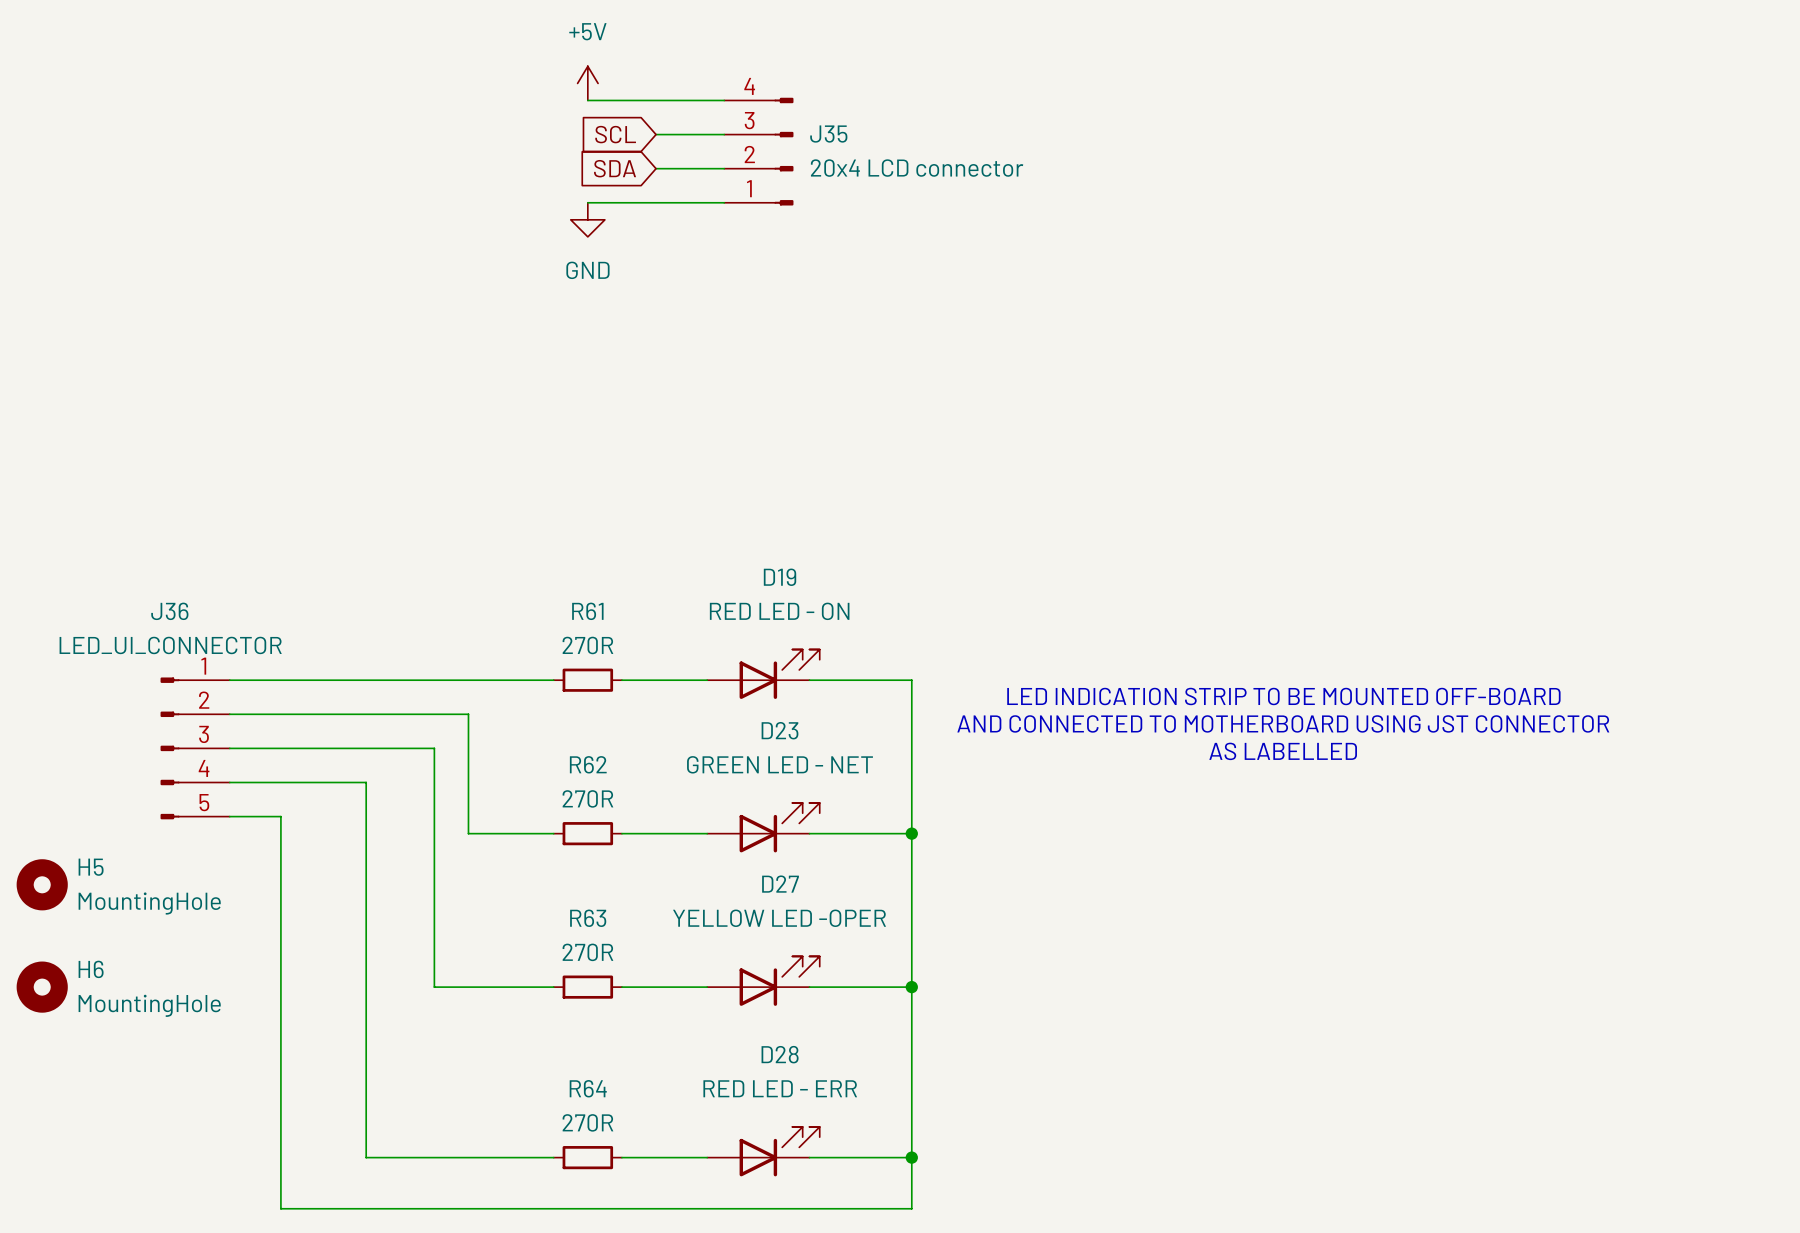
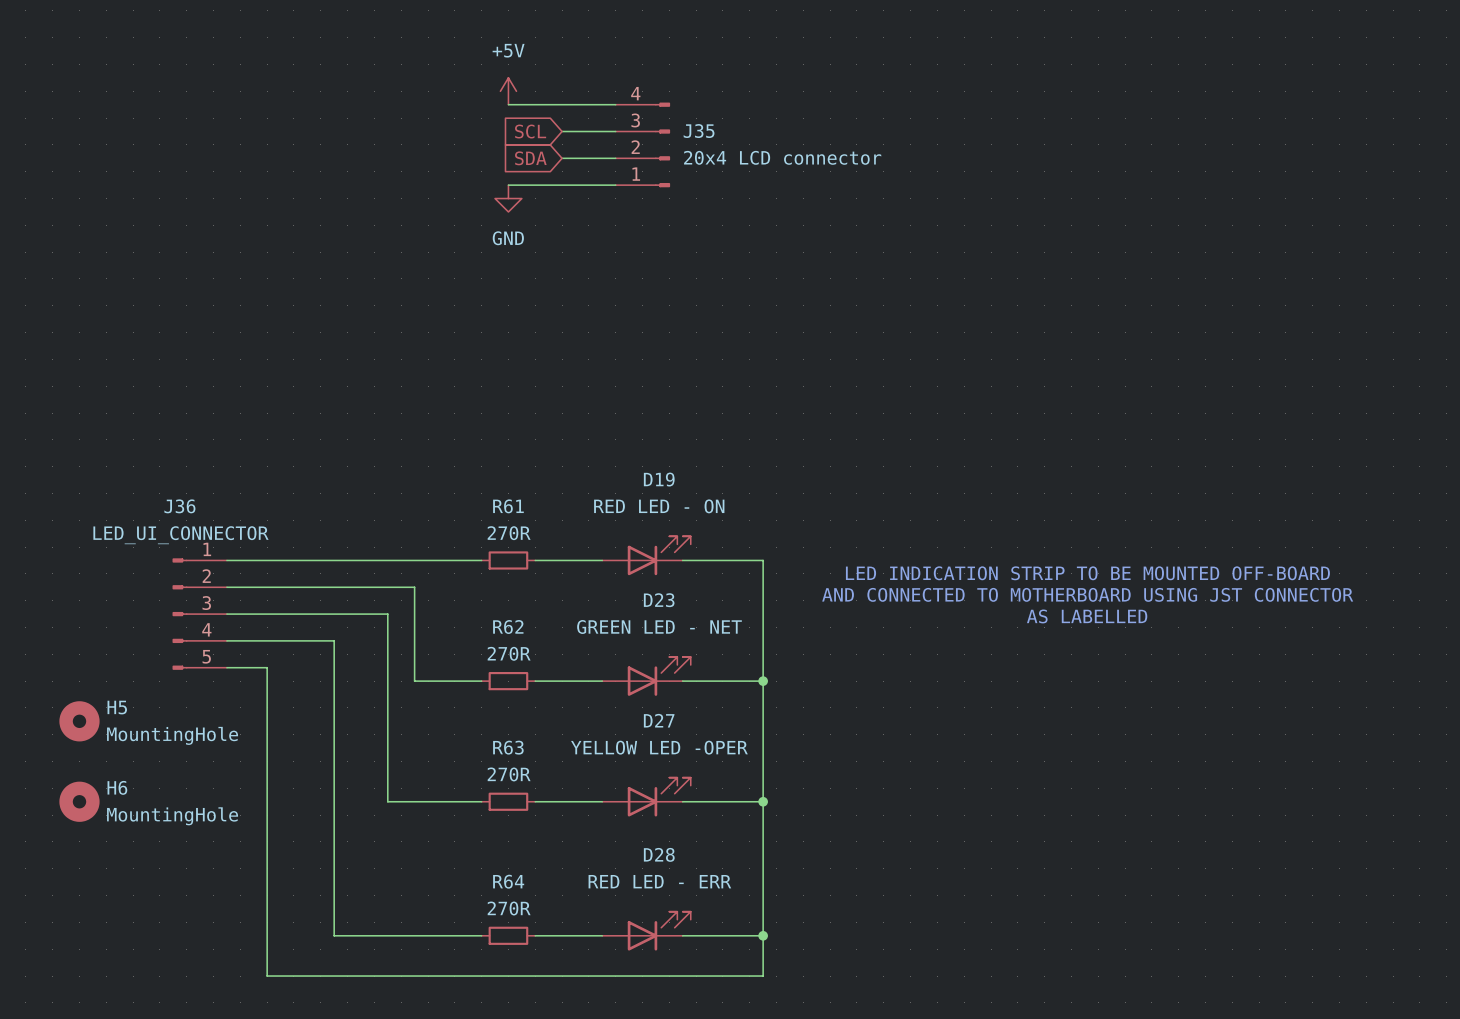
text position: LED INDICATION STRIP TO BE MOUNTED OFF-BOARD (1283, 696) -> LED INDICATION STRIP TO BE MOUNTED OFF-BOARD (1087, 573)
text position: AND CONNECTED TO MOTHERBOARD USING JST CONNECTOR (1283, 723) -> AND CONNECTED TO MOTHERBOARD USING JST CONNECTOR (1087, 594)
text position: AS LABELLED (1283, 751) -> AS LABELLED (1087, 616)

